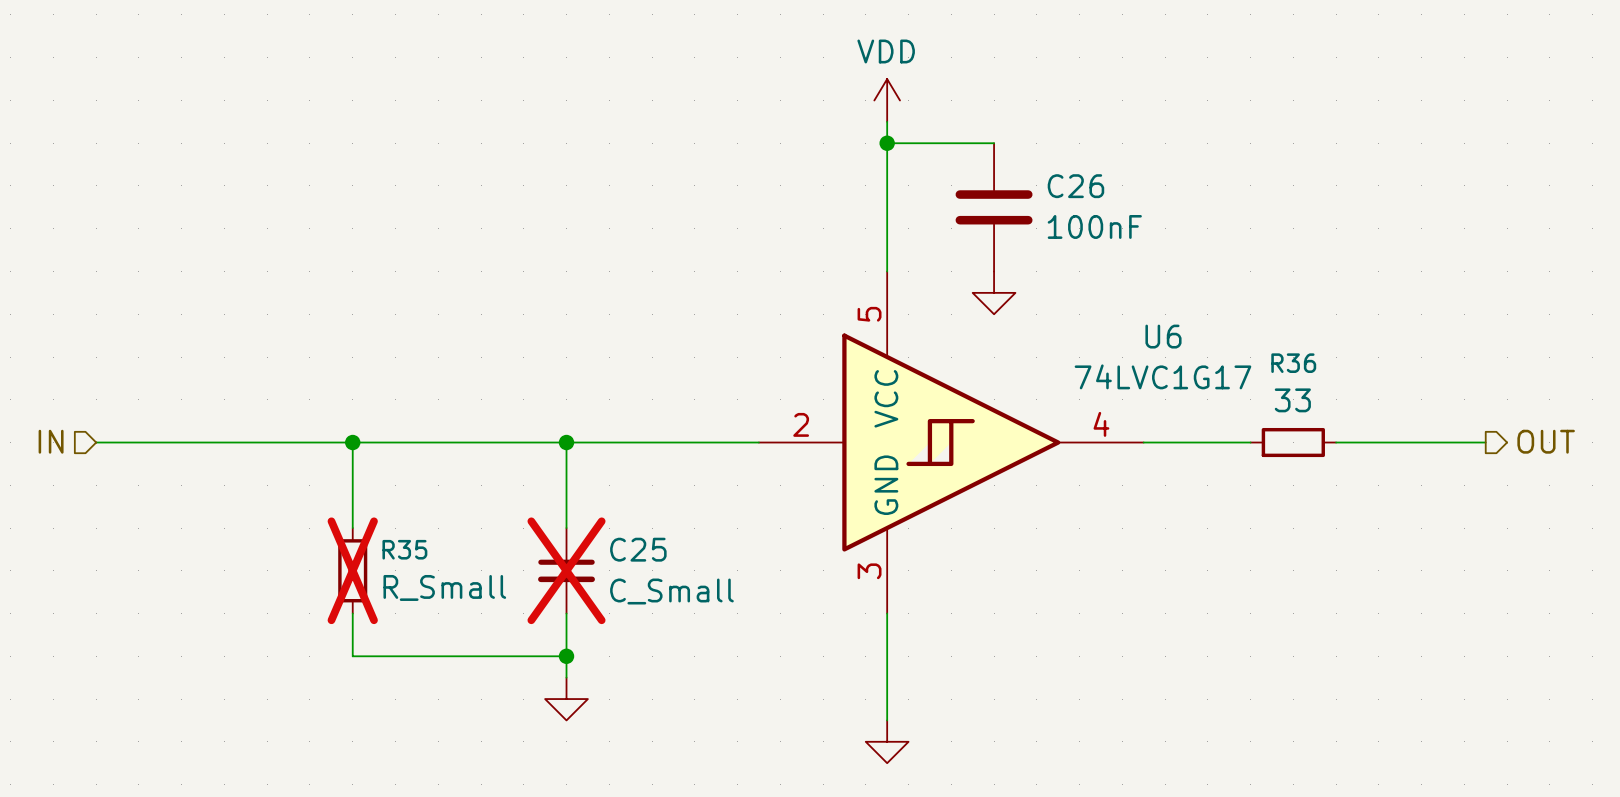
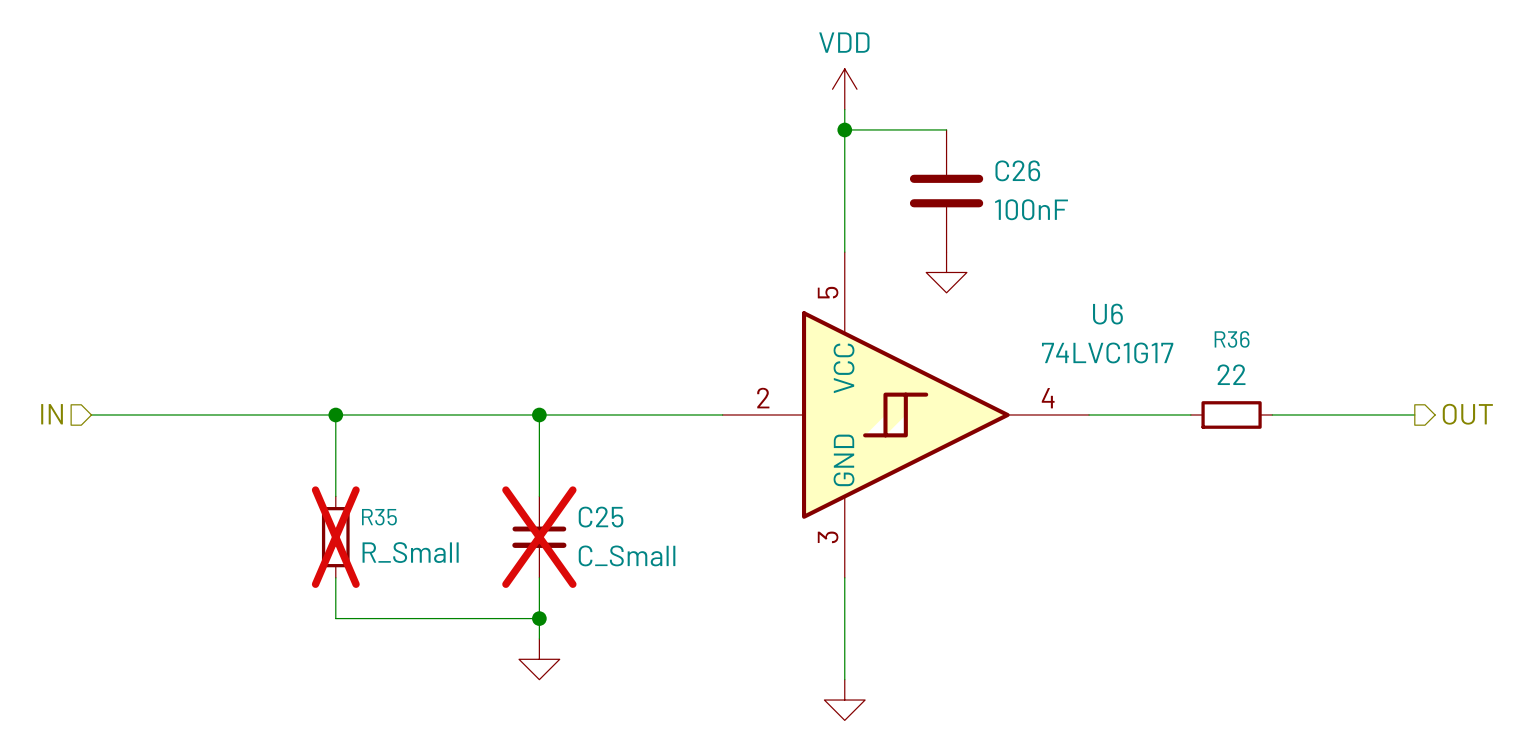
R36 value: 33 (1292, 400) -> 22 (1231, 374)

